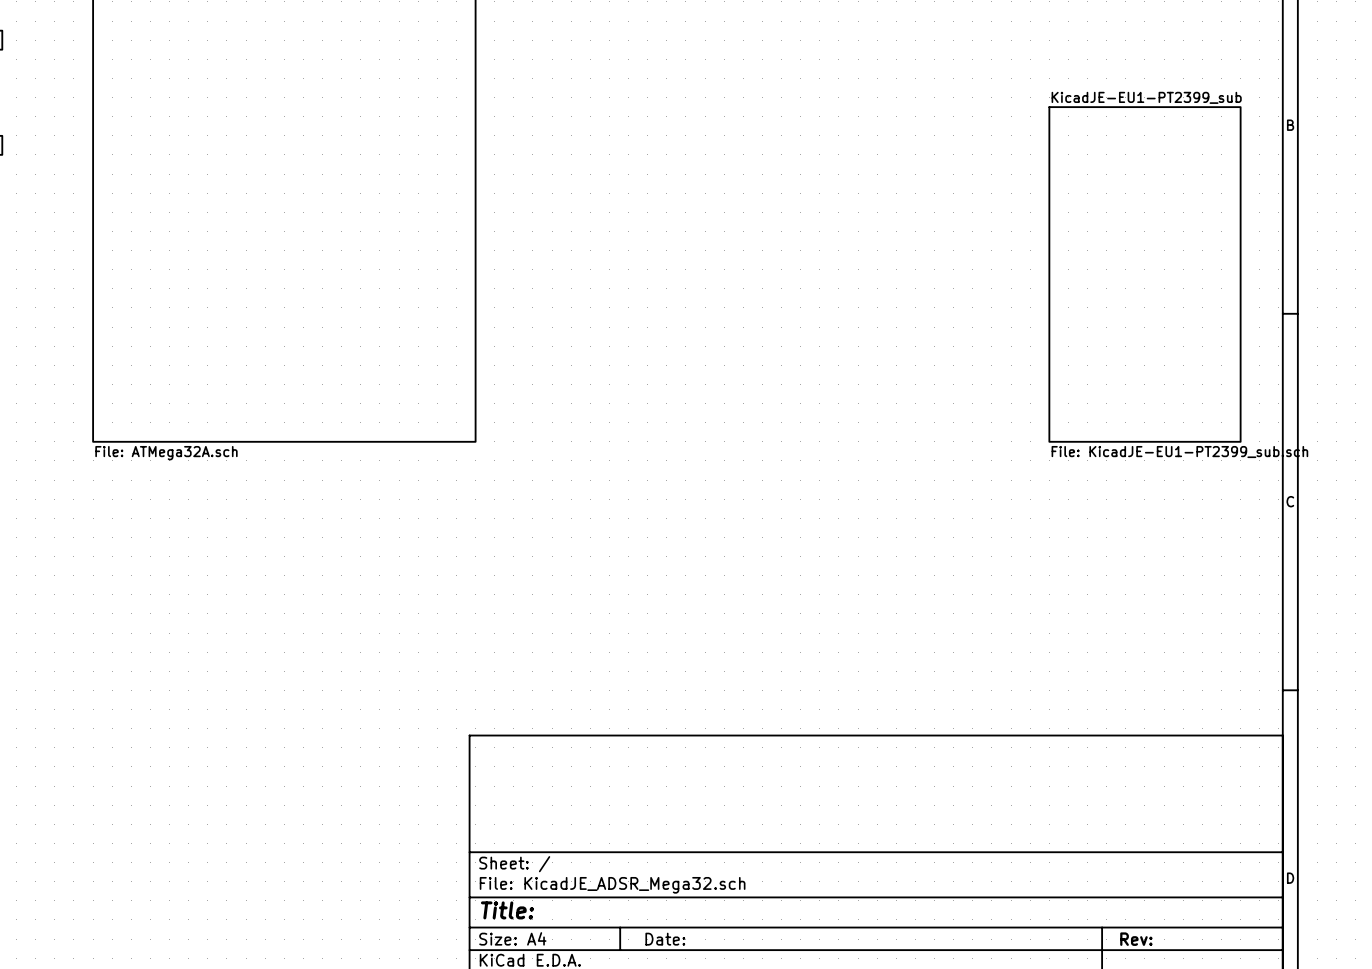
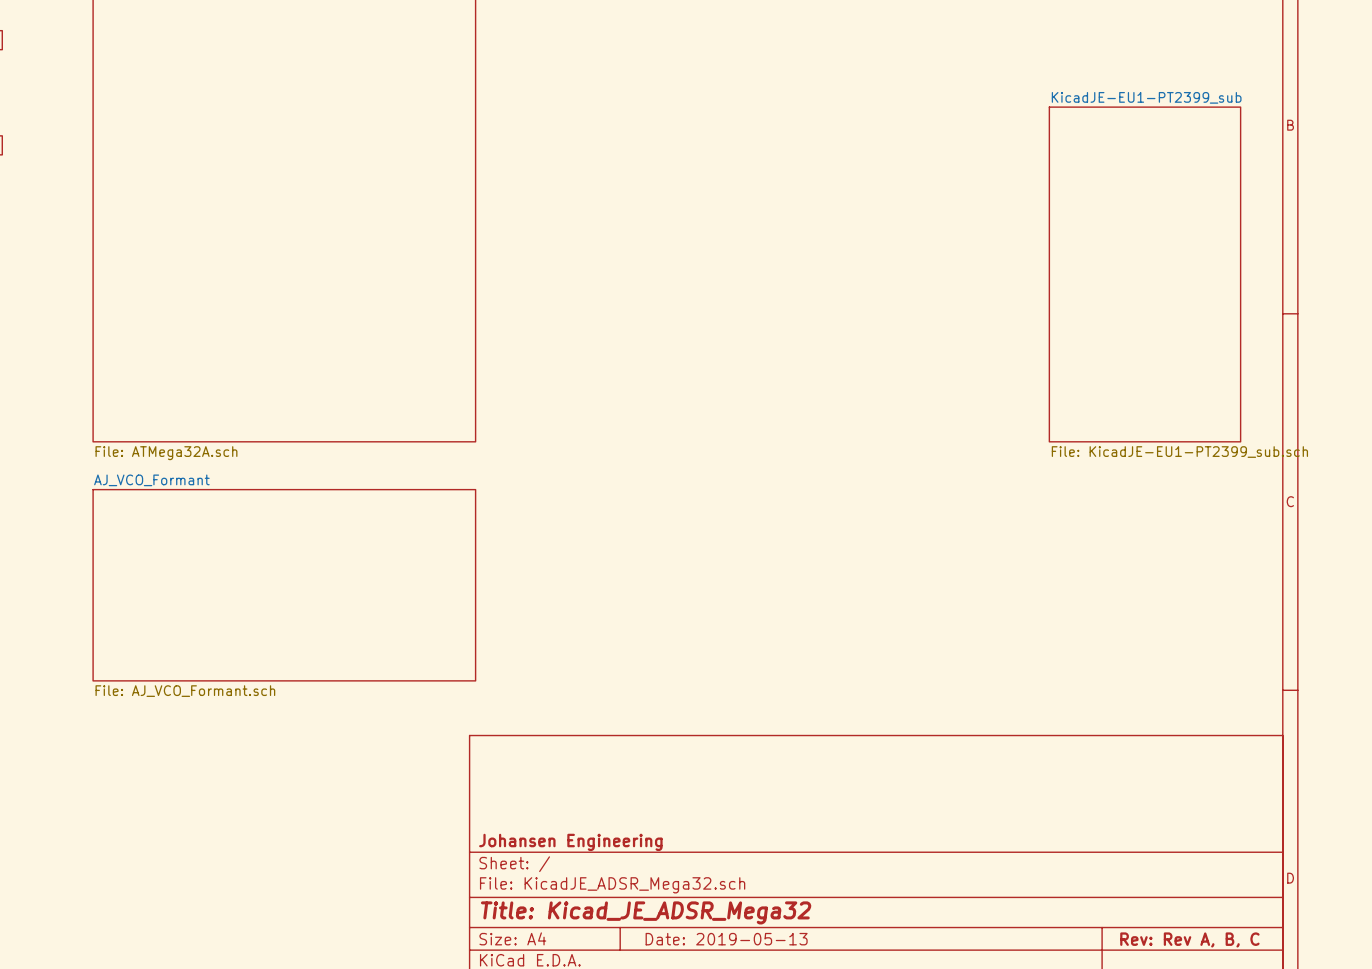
sheet AJ_VCO_Formant: none -> File: AJ_VCO_Formant.sch (284, 585)
title block: none -> Johansen Engineering (570, 842)
title block: Title: (507, 910) -> Title: Kicad_JE_ADSR_Mega32 (646, 912)
title block: Date: (665, 939) -> Date: 2019-05-13 (726, 939)
title block: Rev: (1136, 939) -> Rev: Rev A, B, C (1189, 939)

